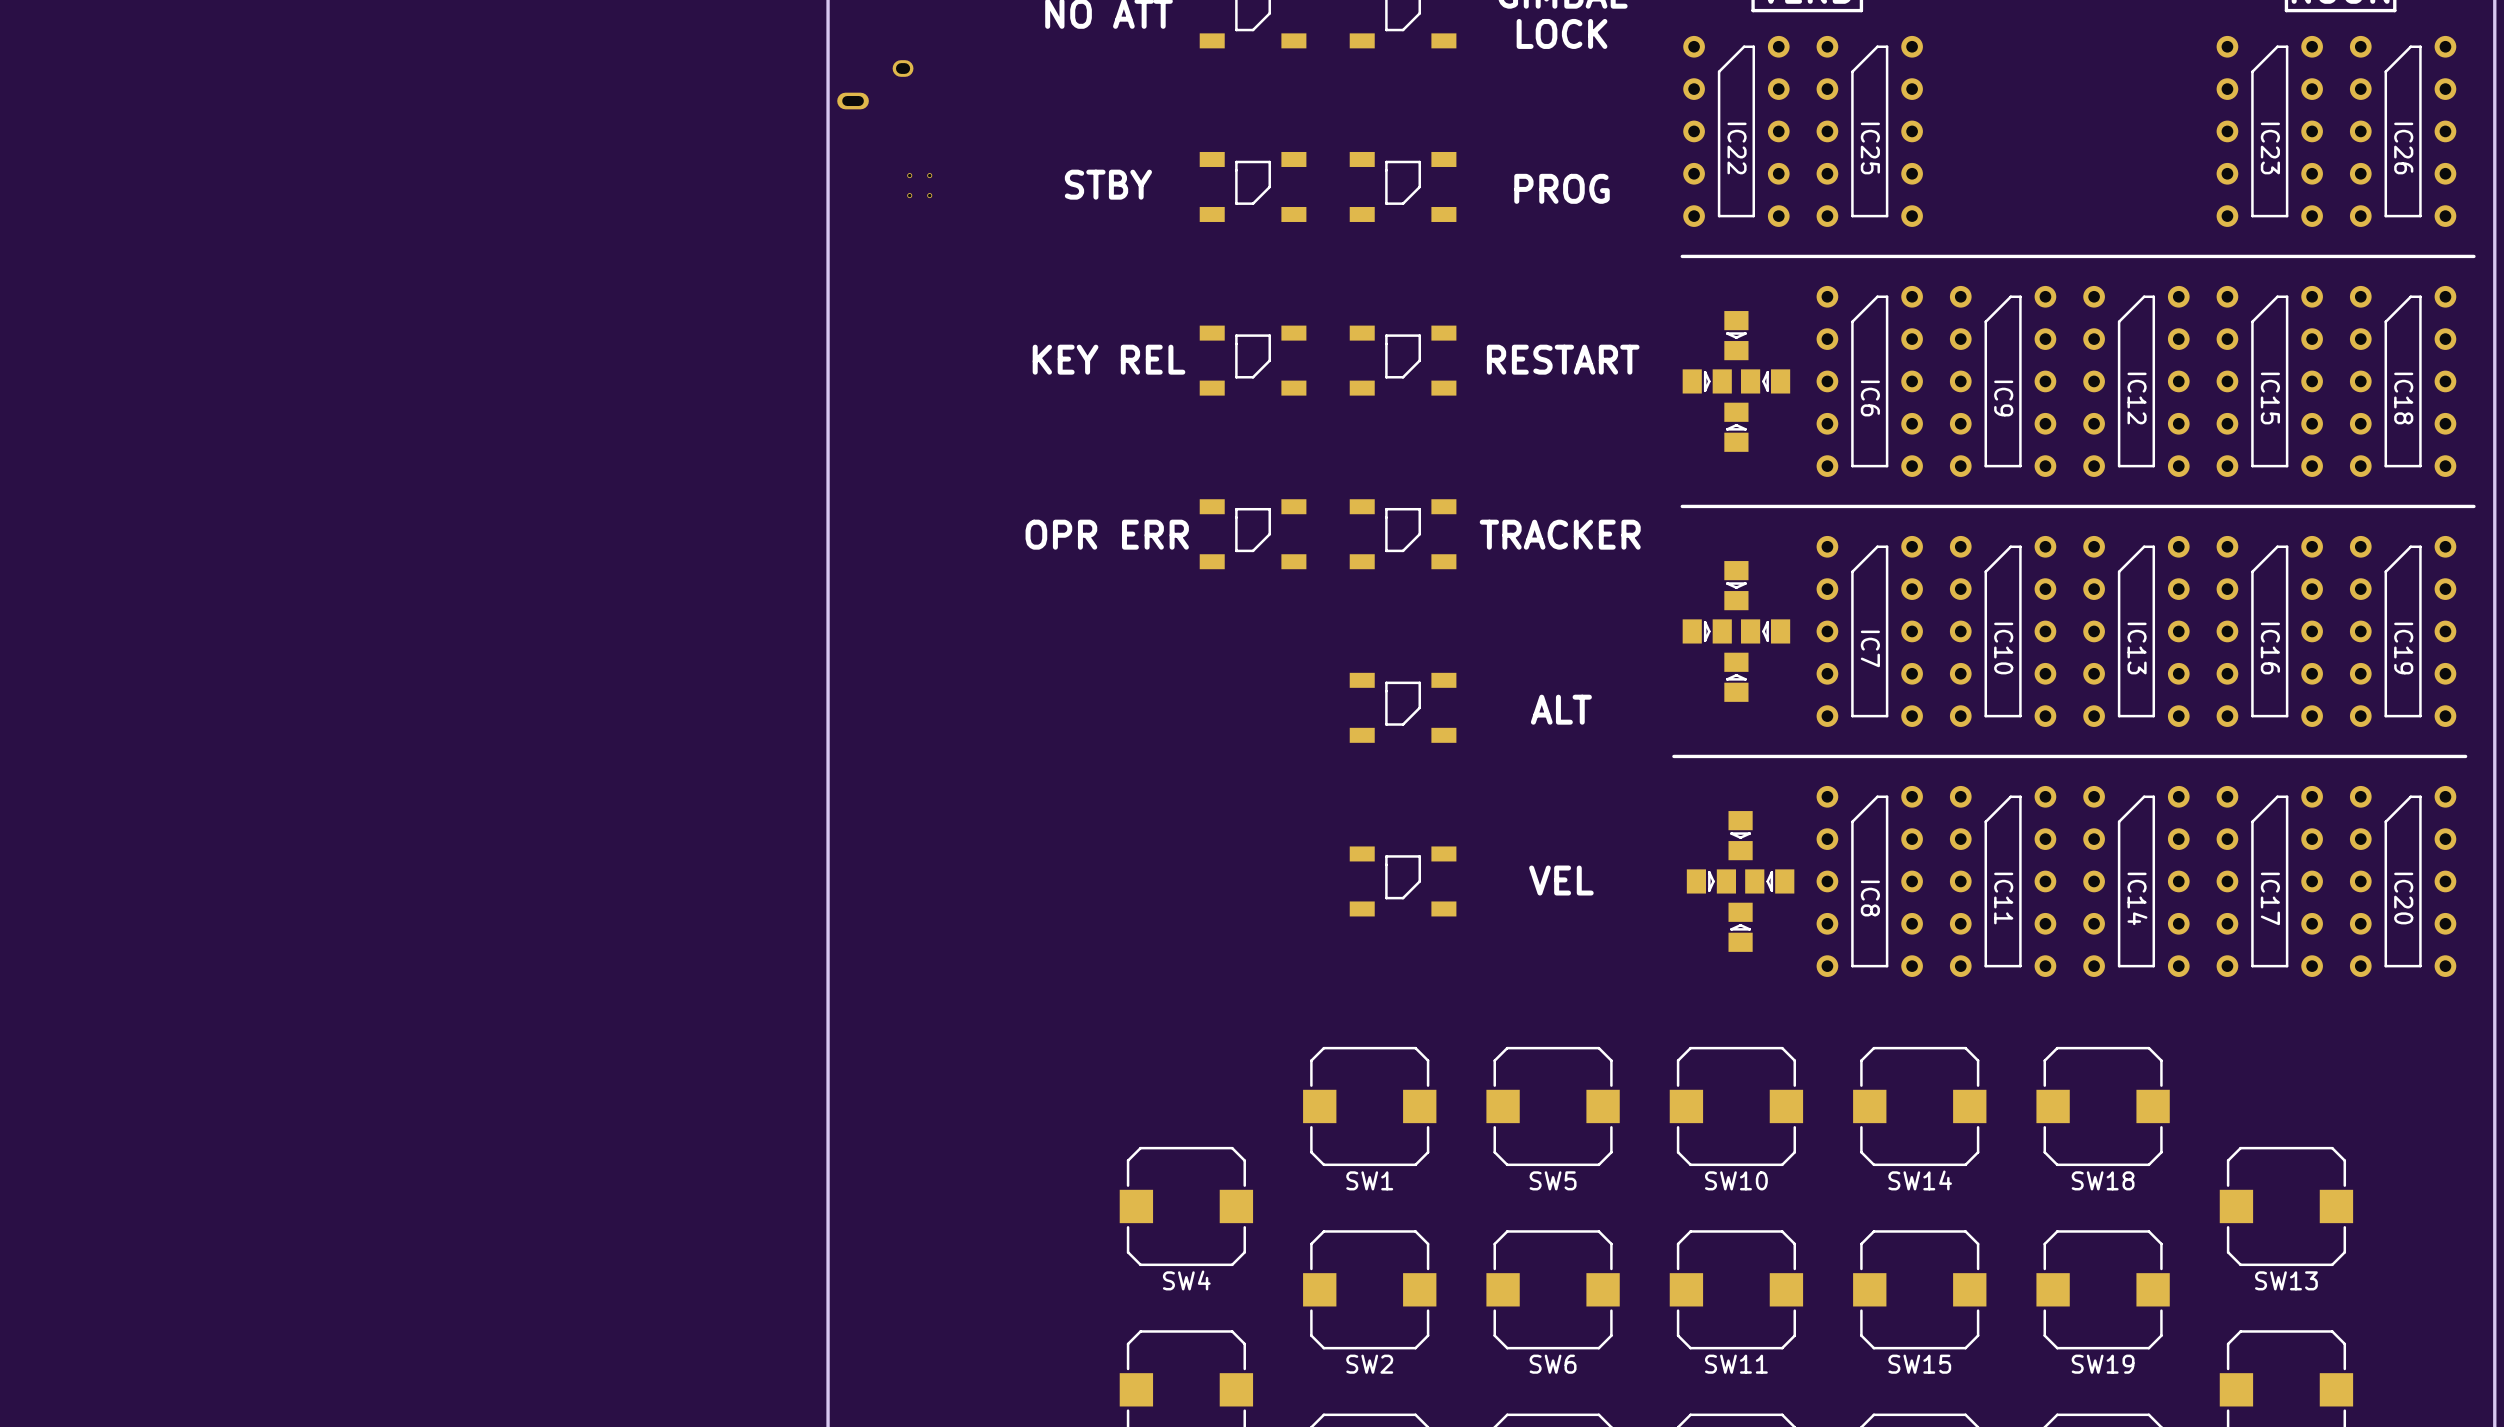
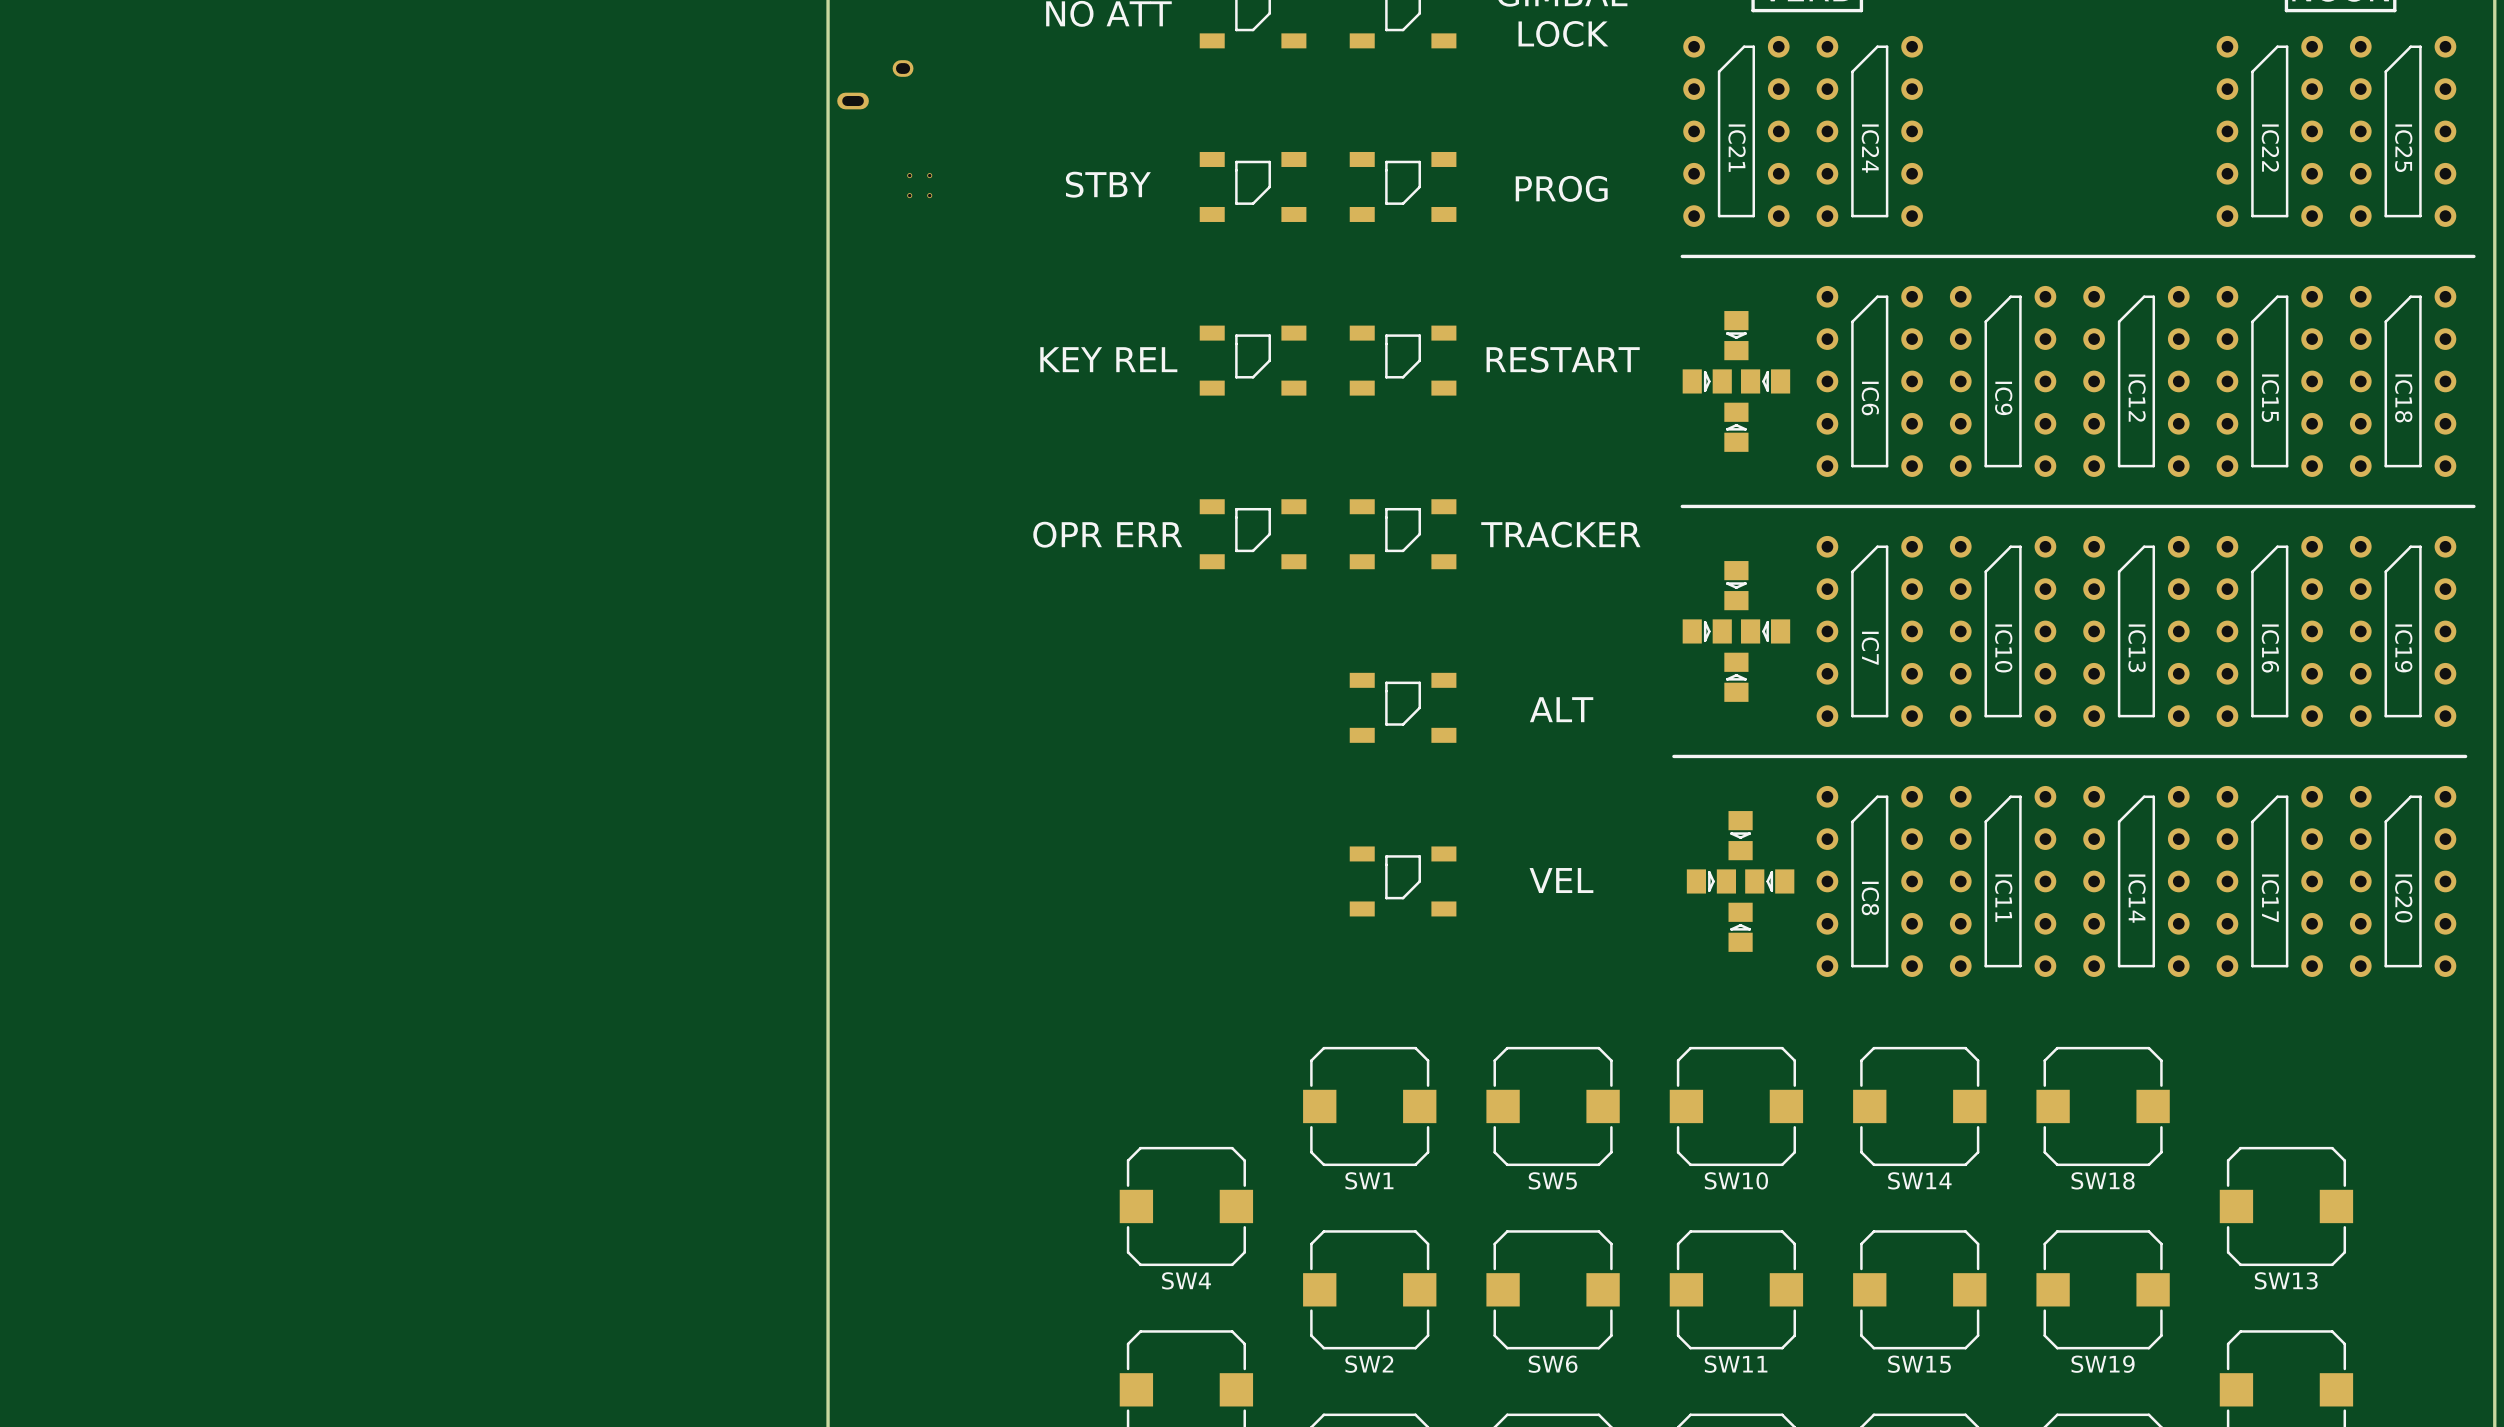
IC22 name: IC22 (1737, 148) -> IC21 (1737, 148)
IC25 name: IC25 (1870, 148) -> IC24 (1870, 148)
IC23 name: IC23 (2270, 148) -> IC22 (2270, 148)
IC26 name: IC26 (2403, 148) -> IC25 (2403, 148)

